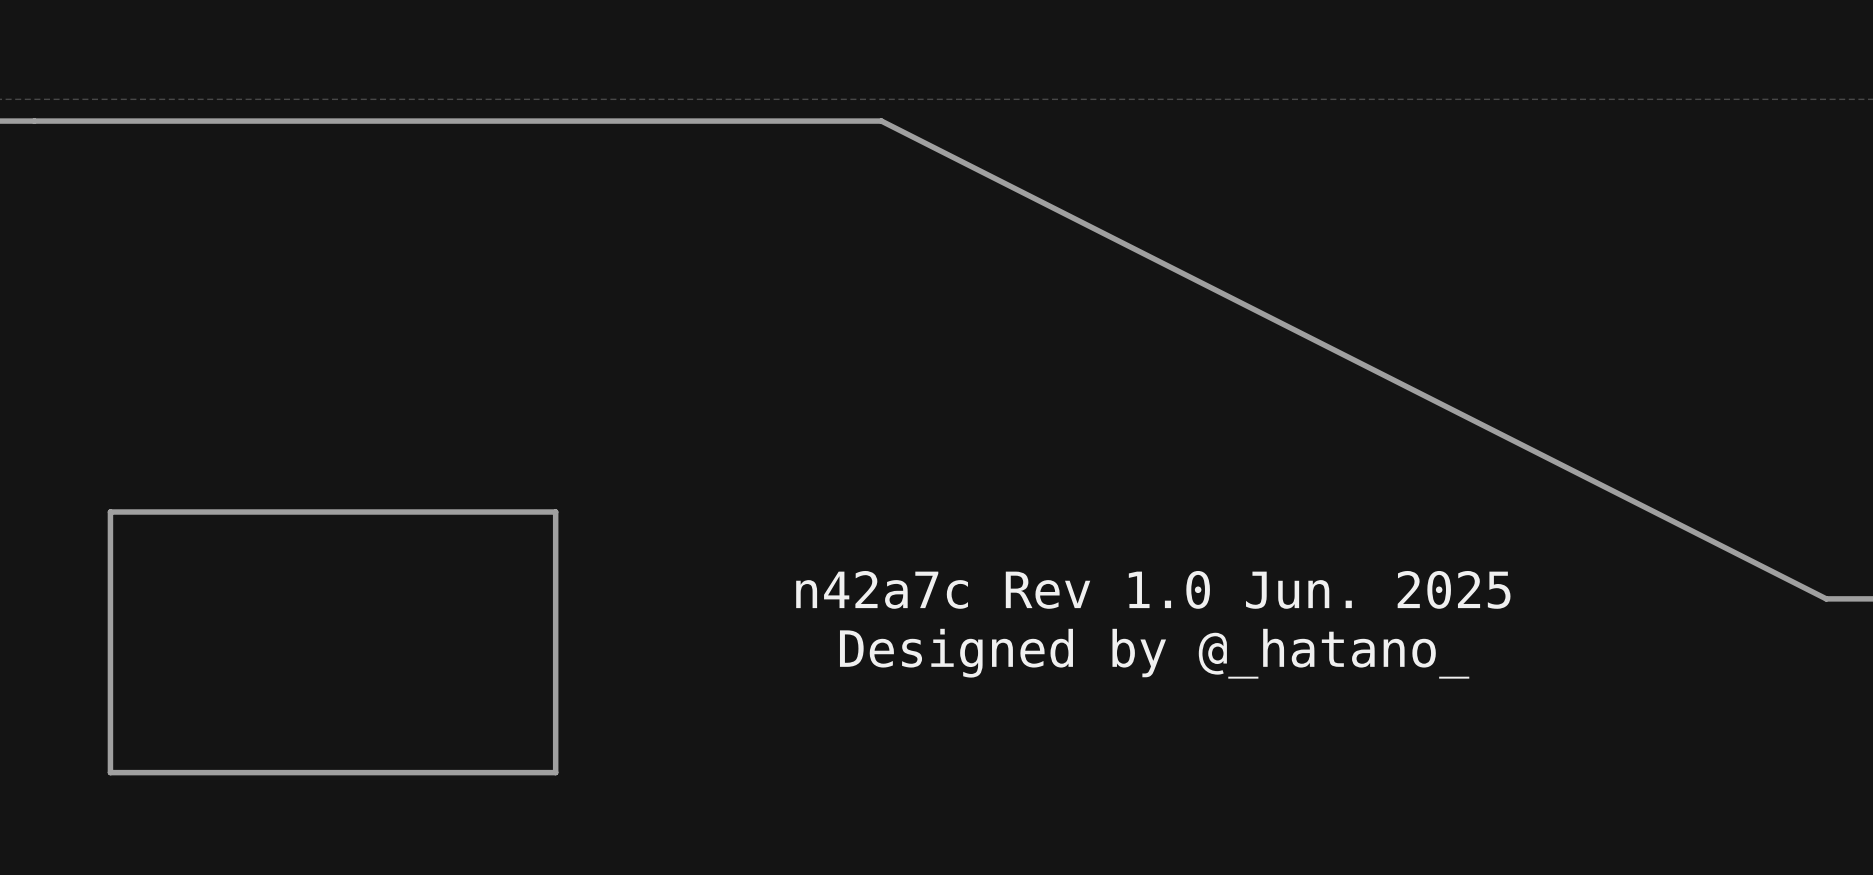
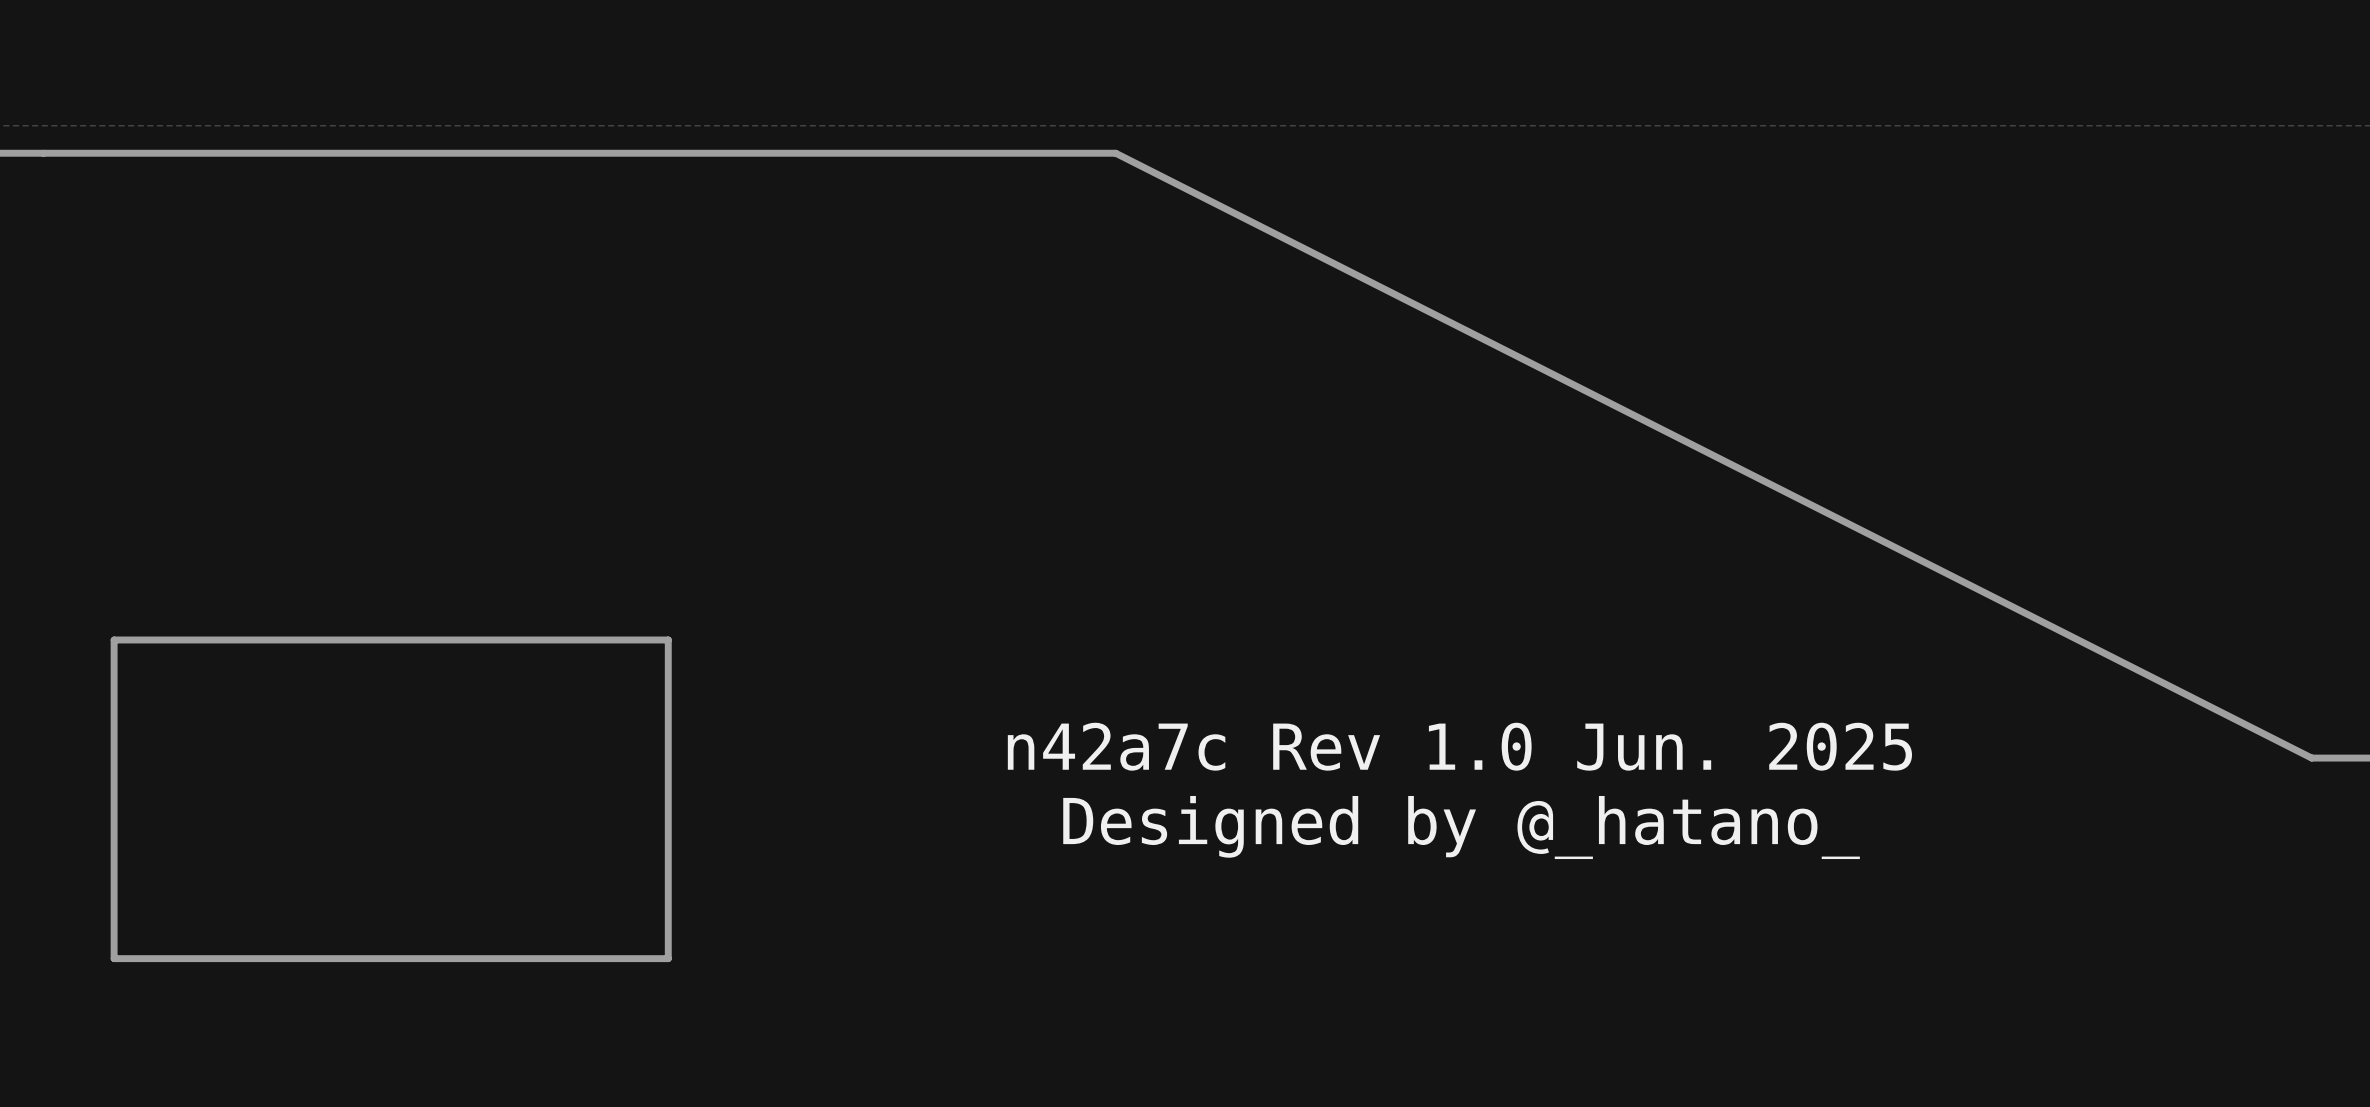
board edge: (110, 512) (555, 512) (555, 772) (110, 772) (110, 512) -> (114, 639) (114, 958) (668, 958) (668, 639) (114, 639)

